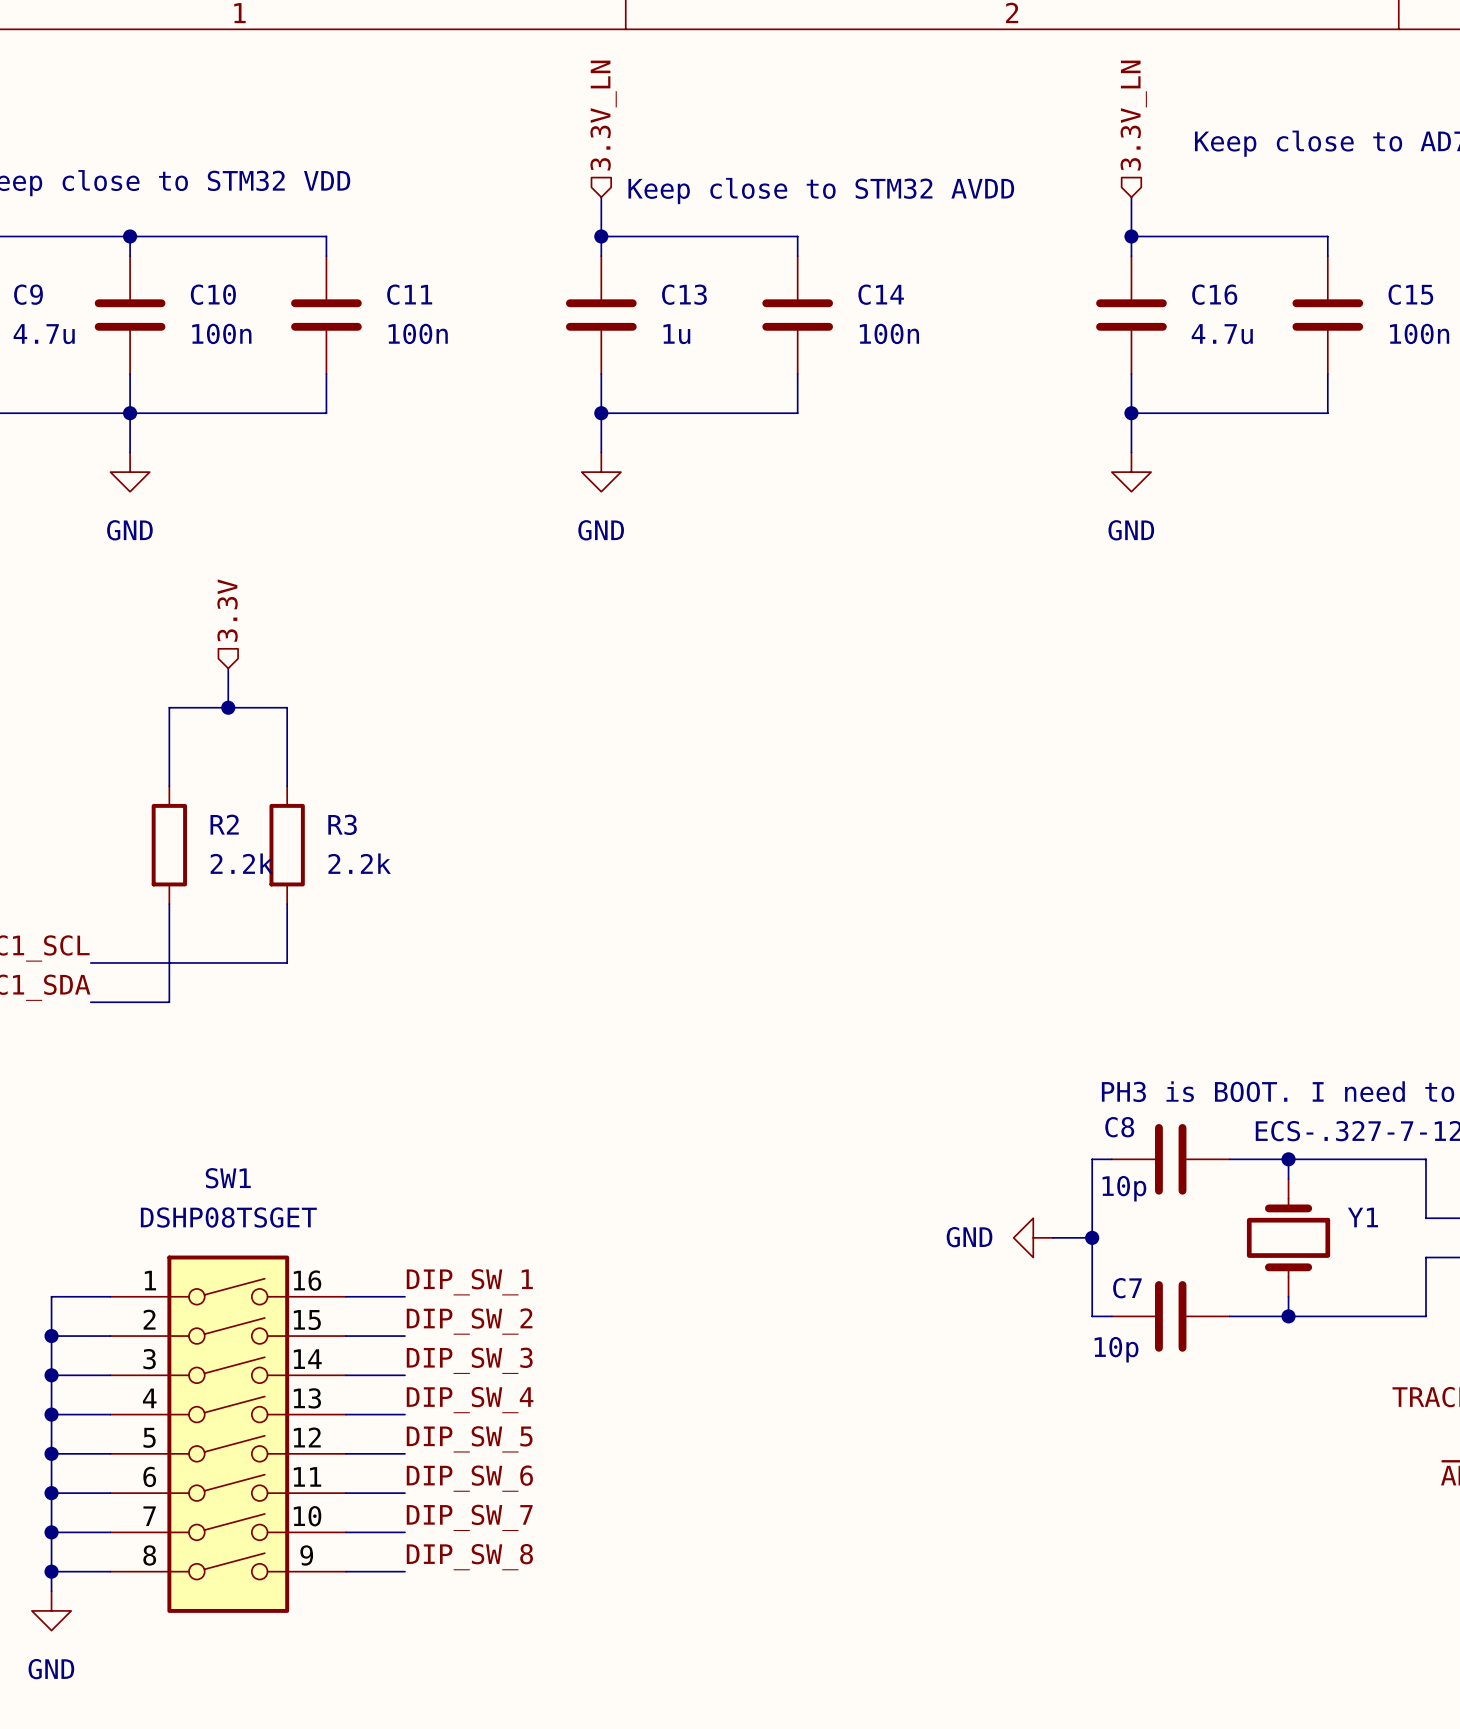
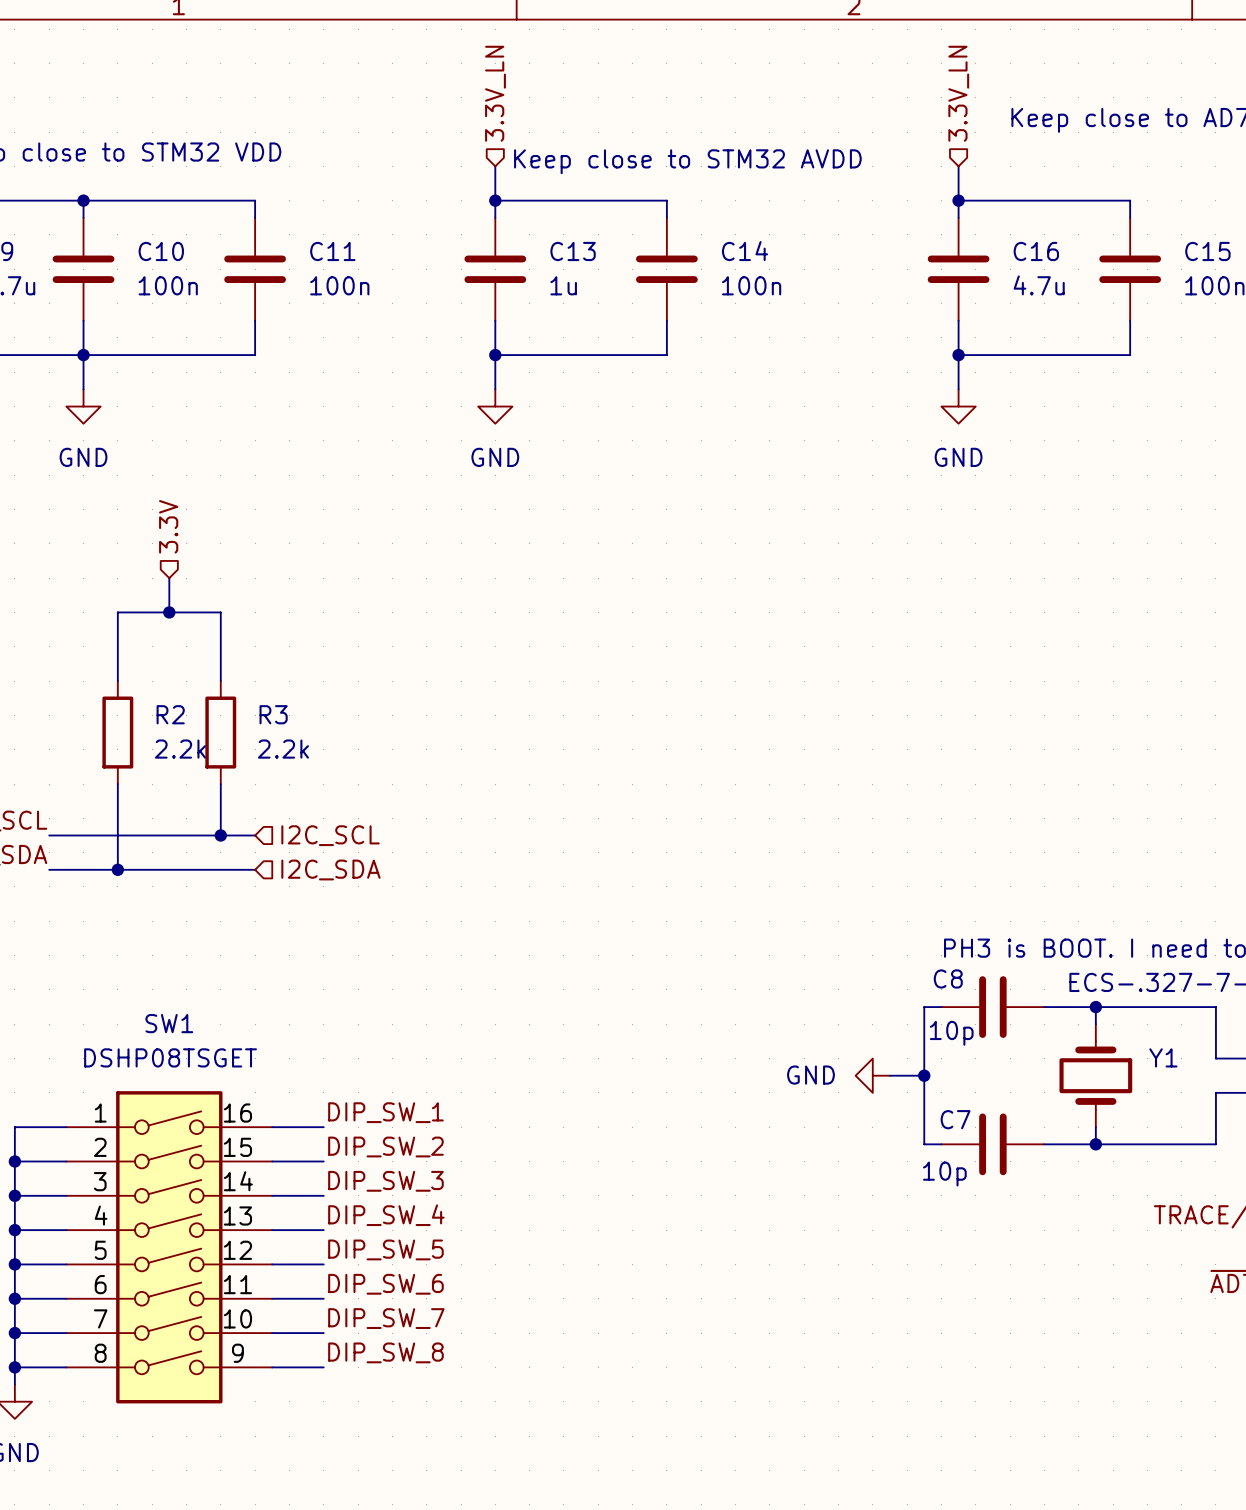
wire: none -> (220, 835) (255, 835)
junction: none -> (220, 835)
hierarchical label: none -> I2C_SCL (330, 835)
wire: none -> (117, 869) (255, 869)
junction: none -> (117, 869)
hierarchical label: none -> I2C_SDA (330, 869)

